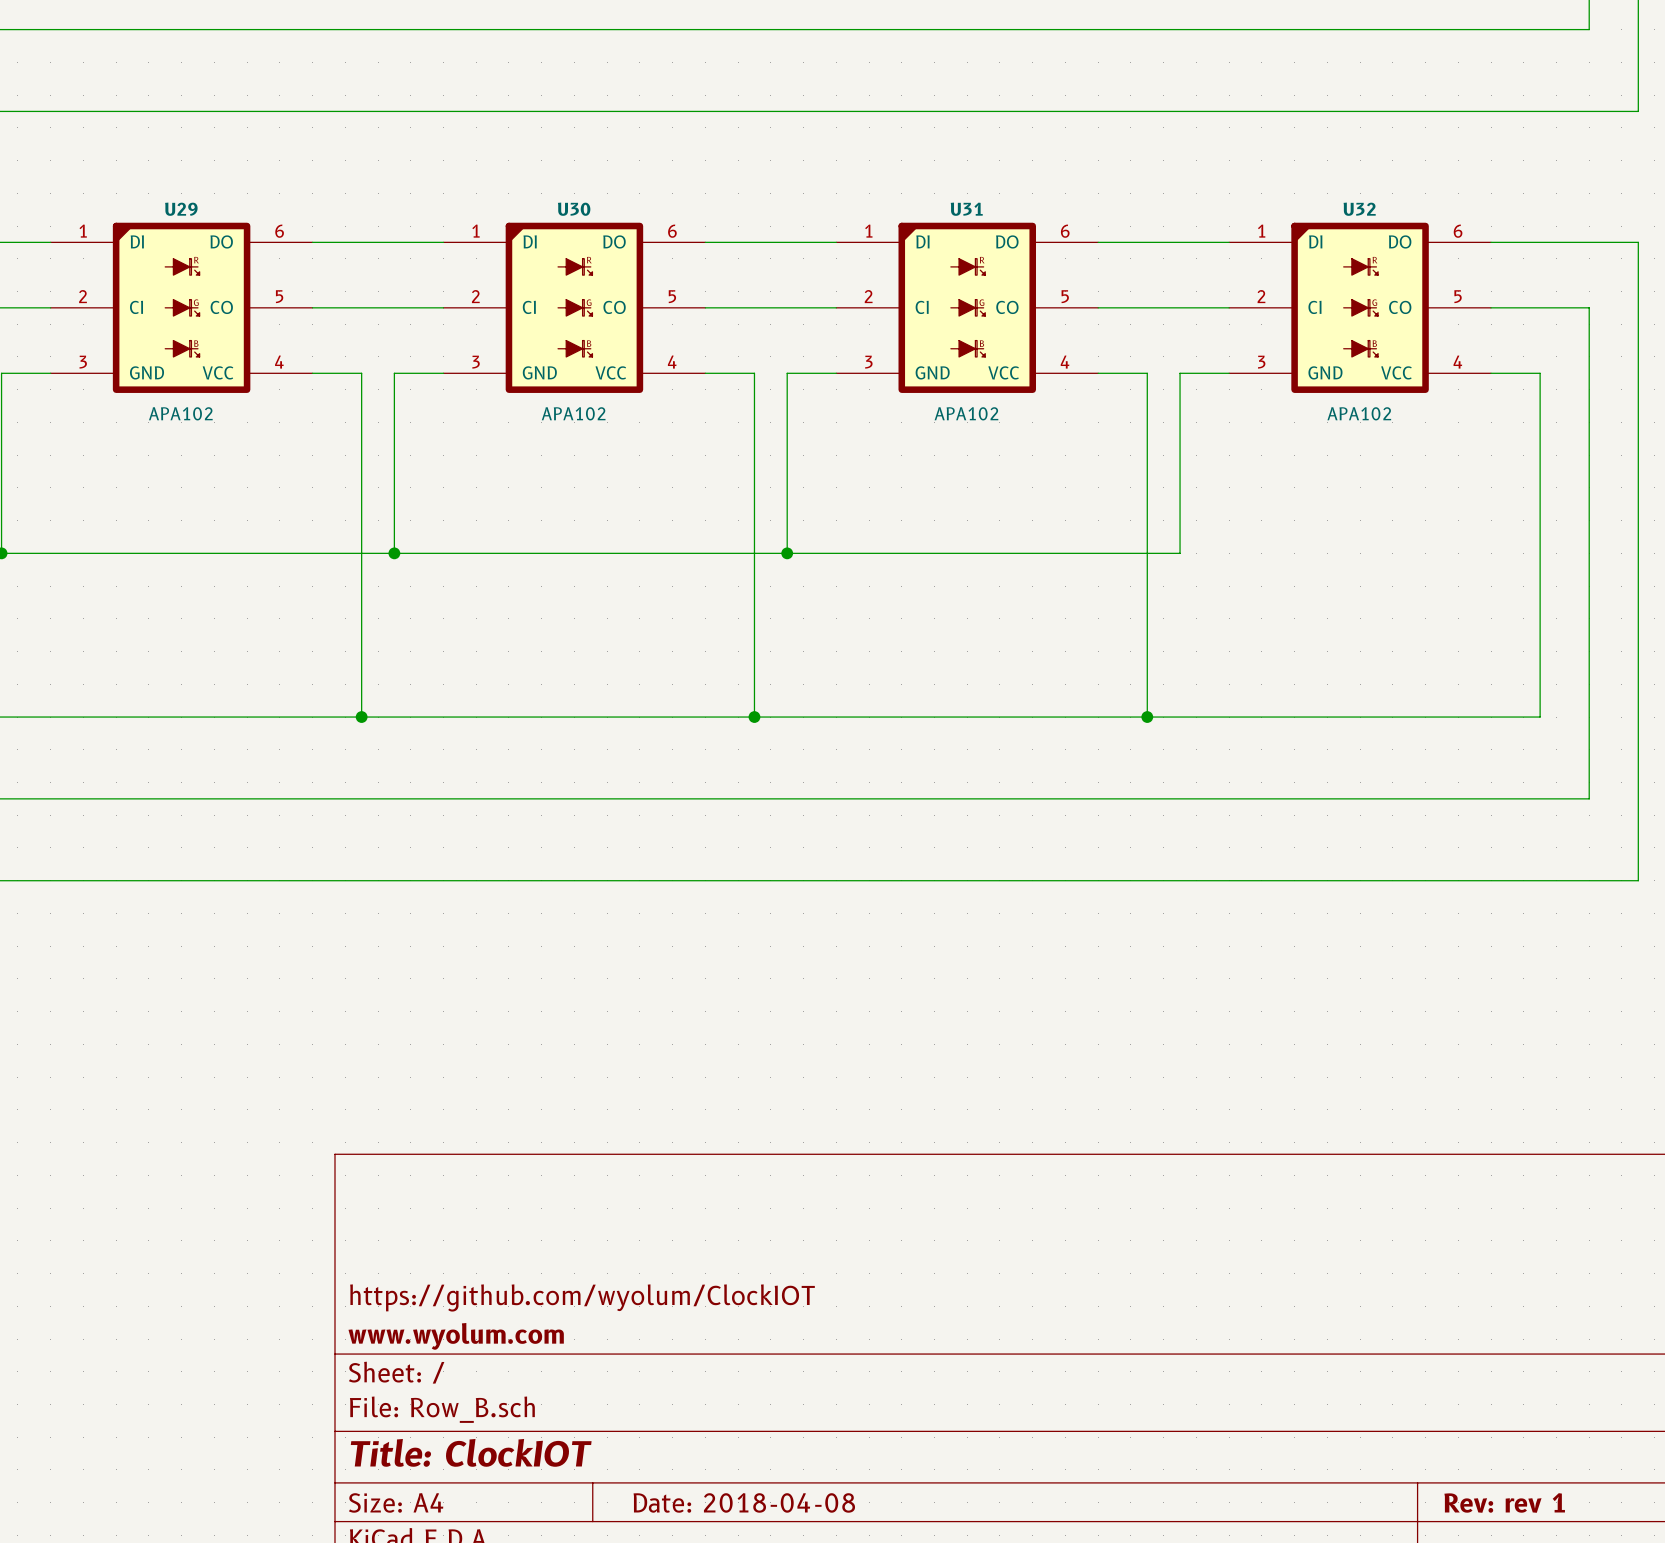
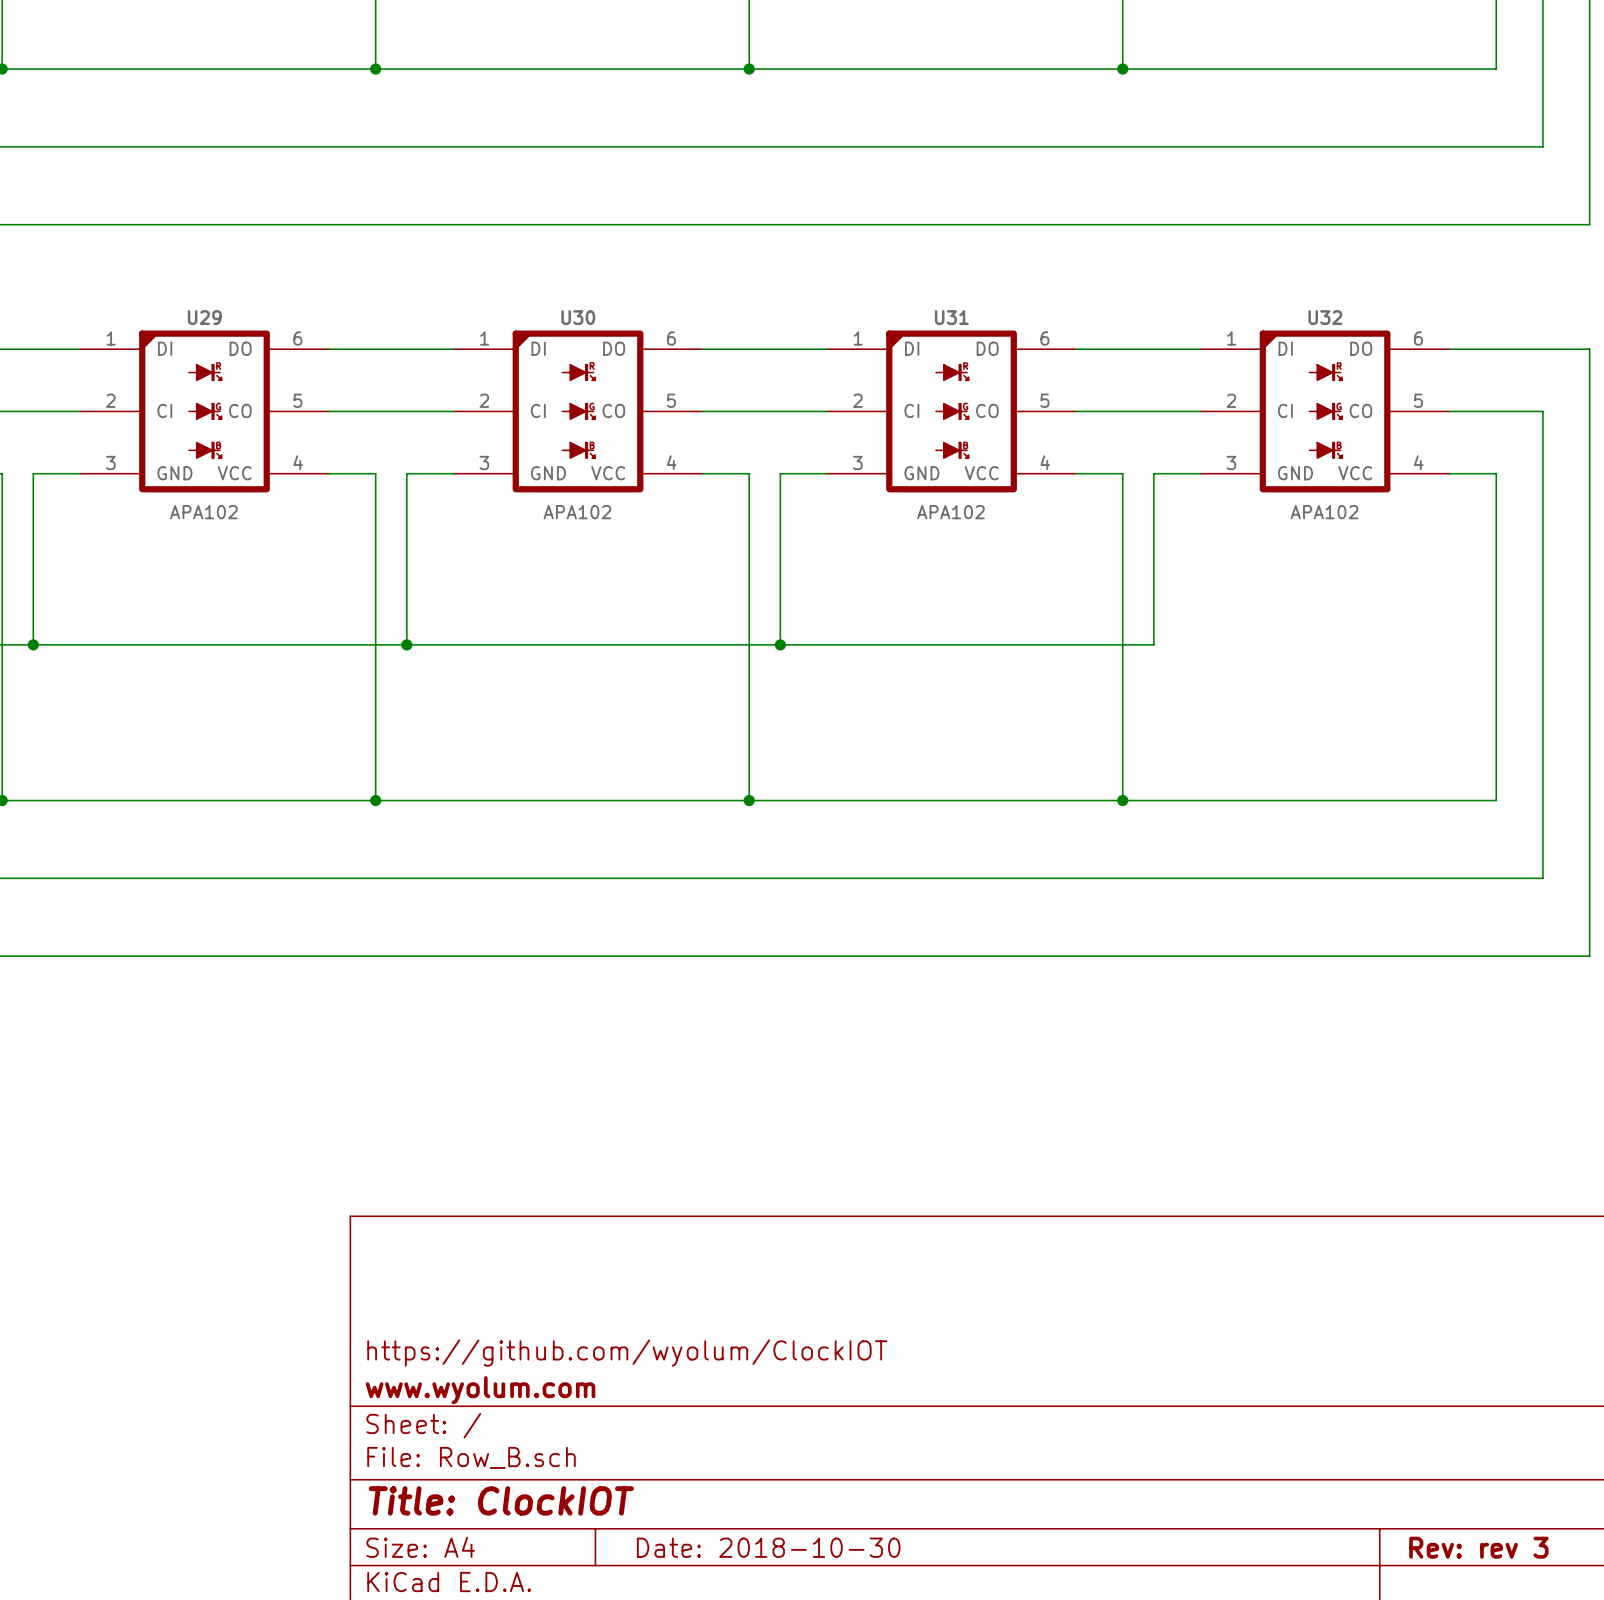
title block: Date: 2018-04-08 (744, 1502) -> Date: 2018-10-30 (768, 1547)
title block: Rev: rev 1 (1504, 1502) -> Rev: rev 3 (1478, 1547)

